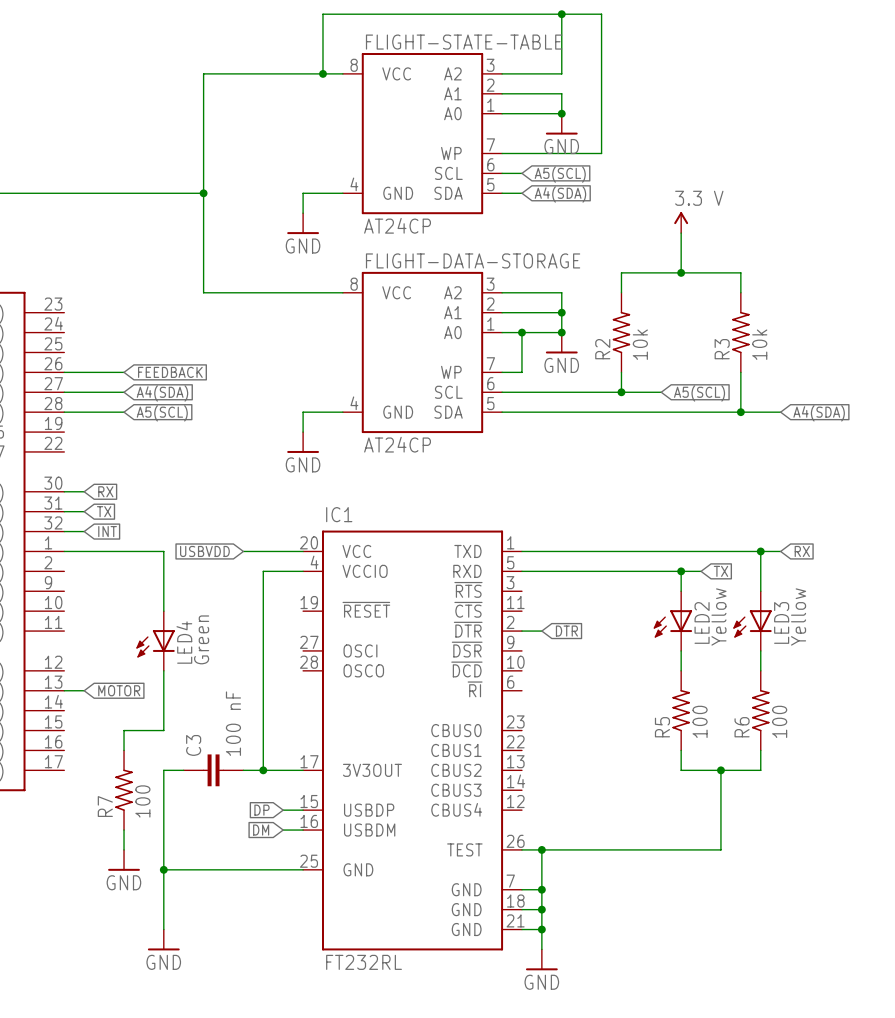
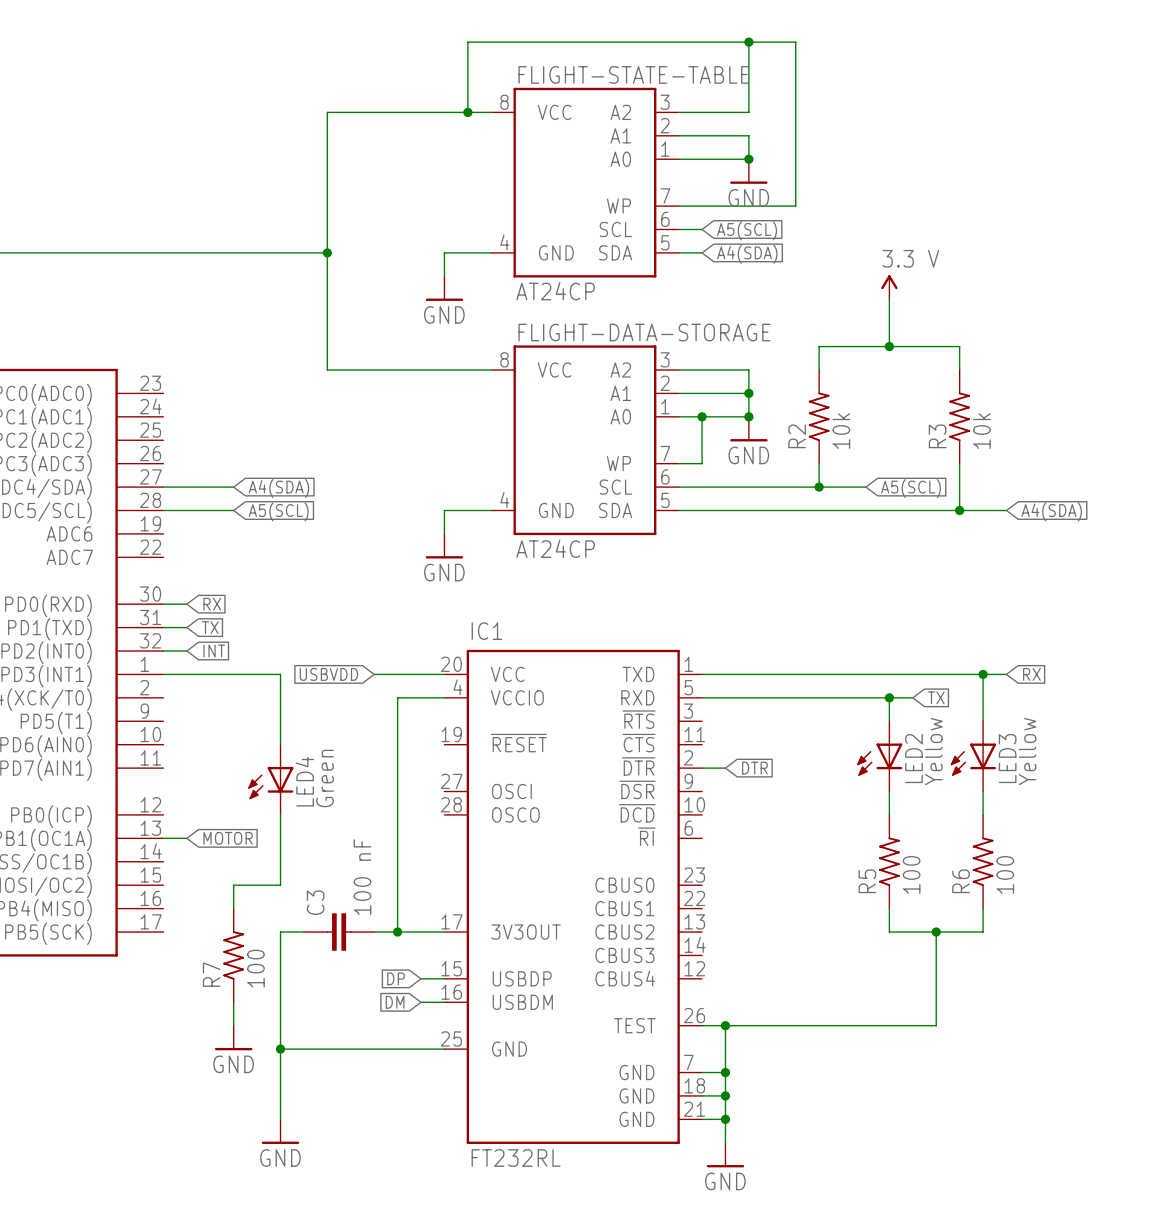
wire: (64, 372) (124, 372) -> none
global label: FEEDBACK (170, 372) -> none

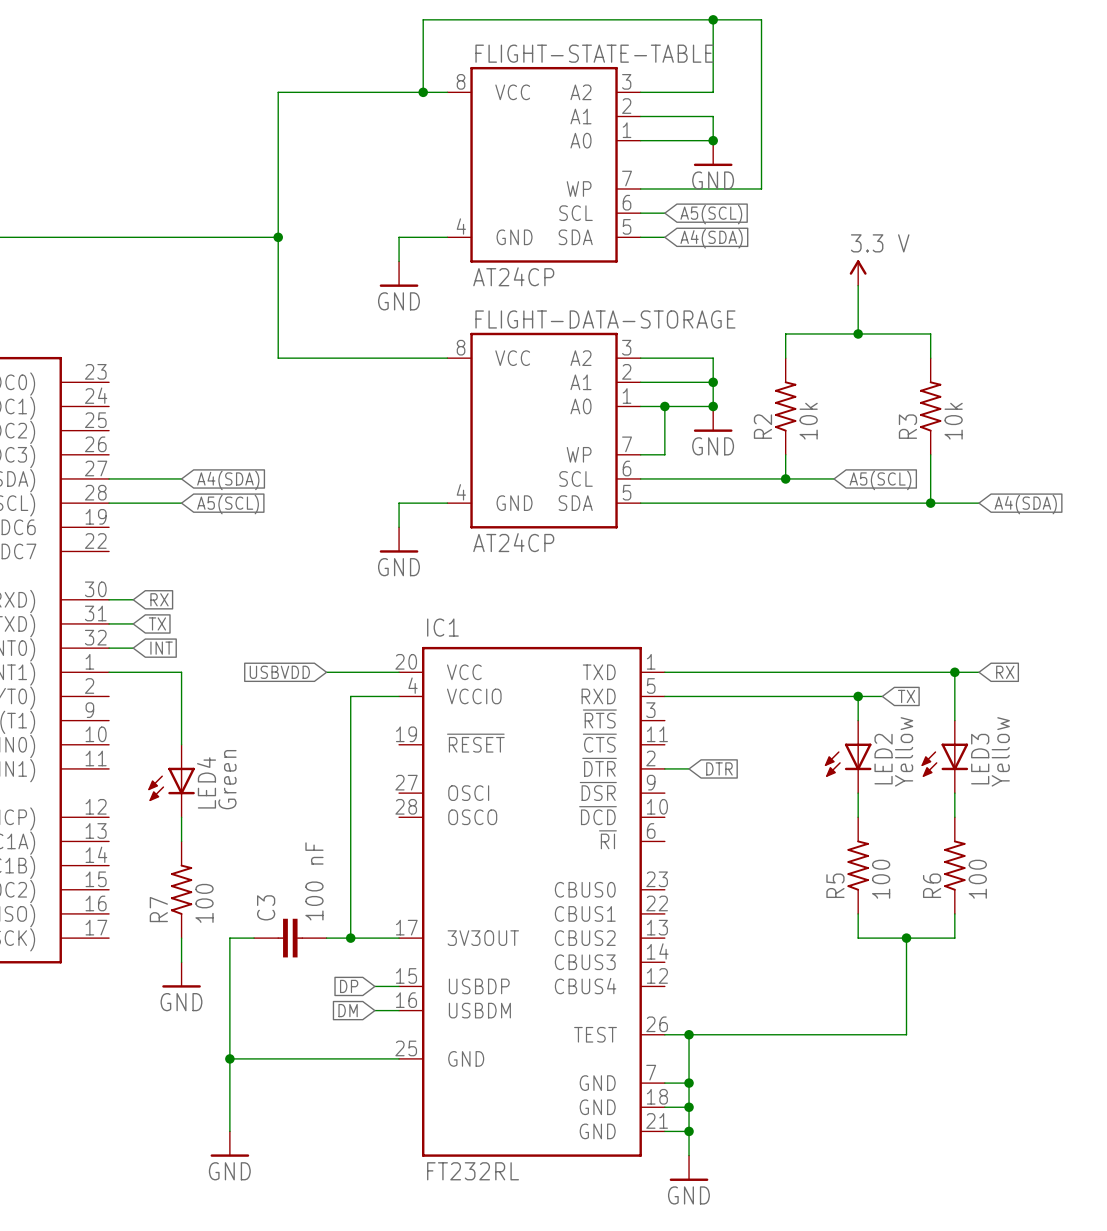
wire: (233, 674) (280, 674) (280, 744) -> (181, 672) (181, 744)
LED4 position: (270, 779) -> (171, 781)
wire: none -> (181, 817) (181, 841)
wire: (280, 814) (280, 885) (233, 885) (233, 908) -> none
wire: (163, 838) (186, 838) -> none
global label: MOTOR (228, 838) -> none
R7 position: (233, 955) -> (181, 889)
wire: (233, 1002) (233, 1025) -> (181, 938) (181, 962)
power symbol position: GND (233, 1037) -> GND (181, 974)

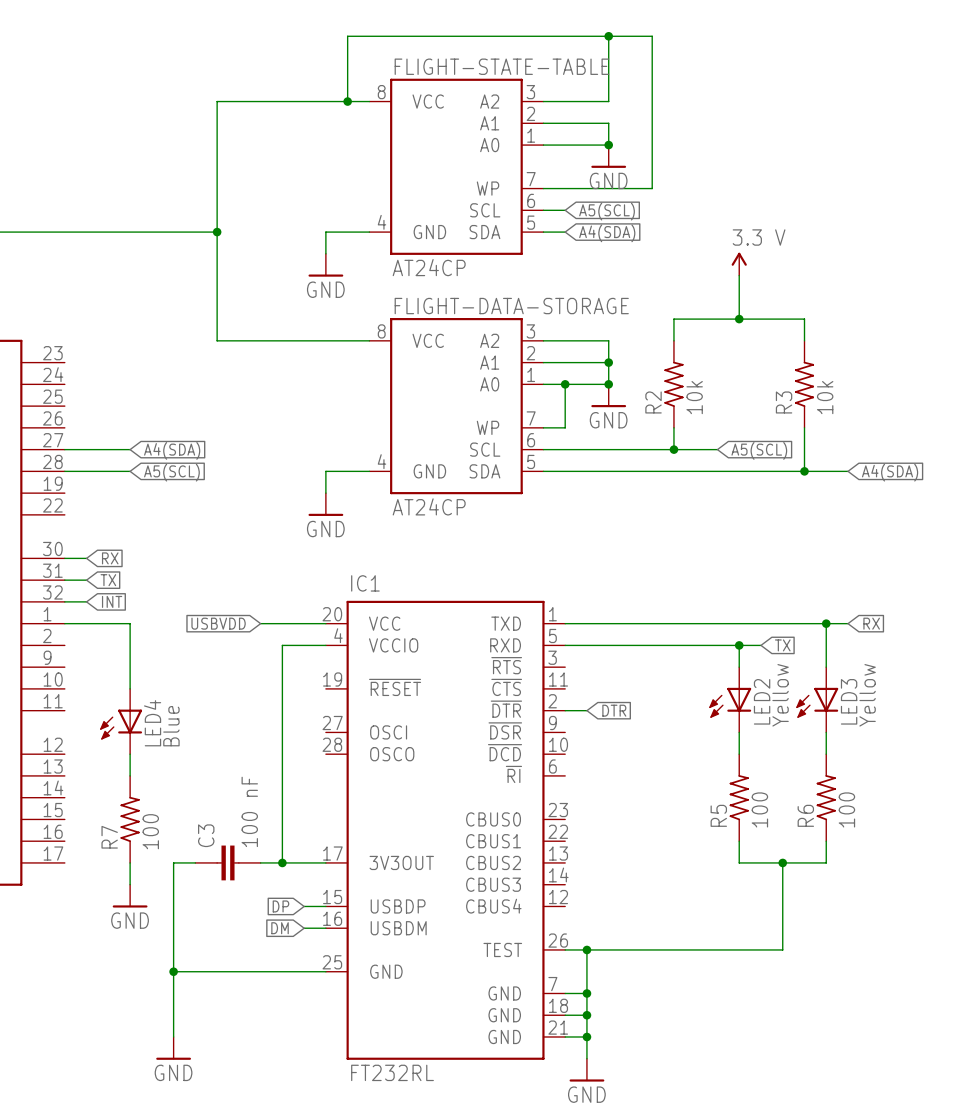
LED4 value: Green (227, 779) -> Blue (171, 726)

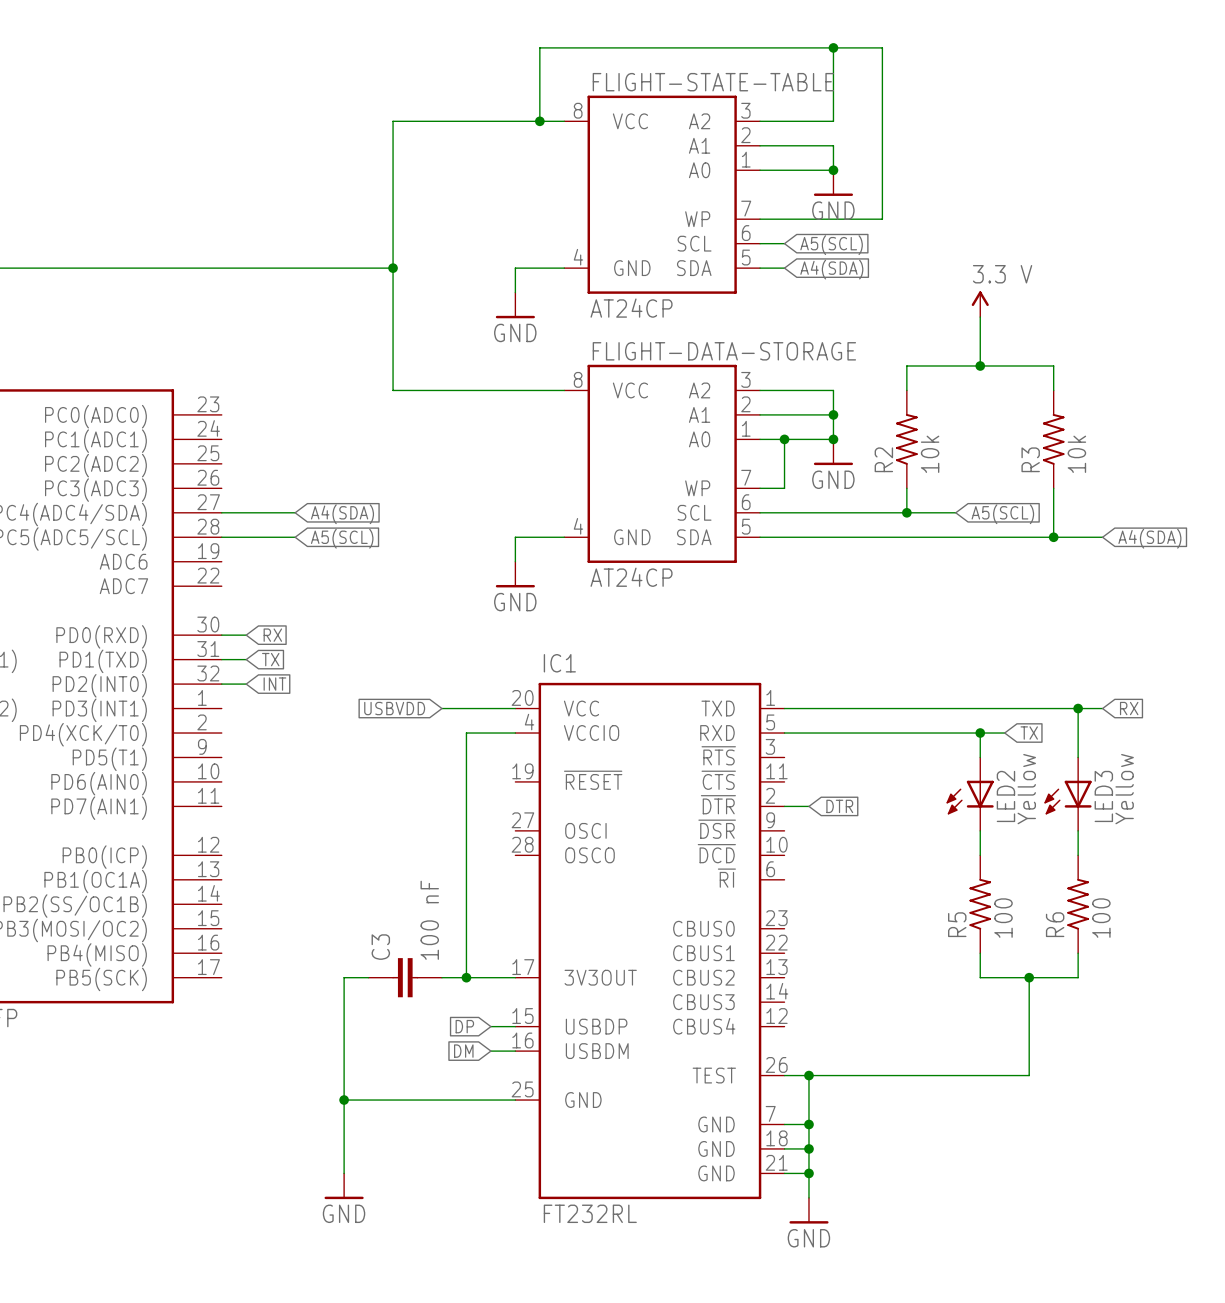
wire: (64, 623) (130, 623) (130, 688) -> none
LED4: Blue (121, 721) -> none
wire: (130, 754) (130, 775) -> none
R7: 100 (130, 819) -> none
wire: (130, 862) (130, 884) -> none
power symbol: GND (130, 896) -> none

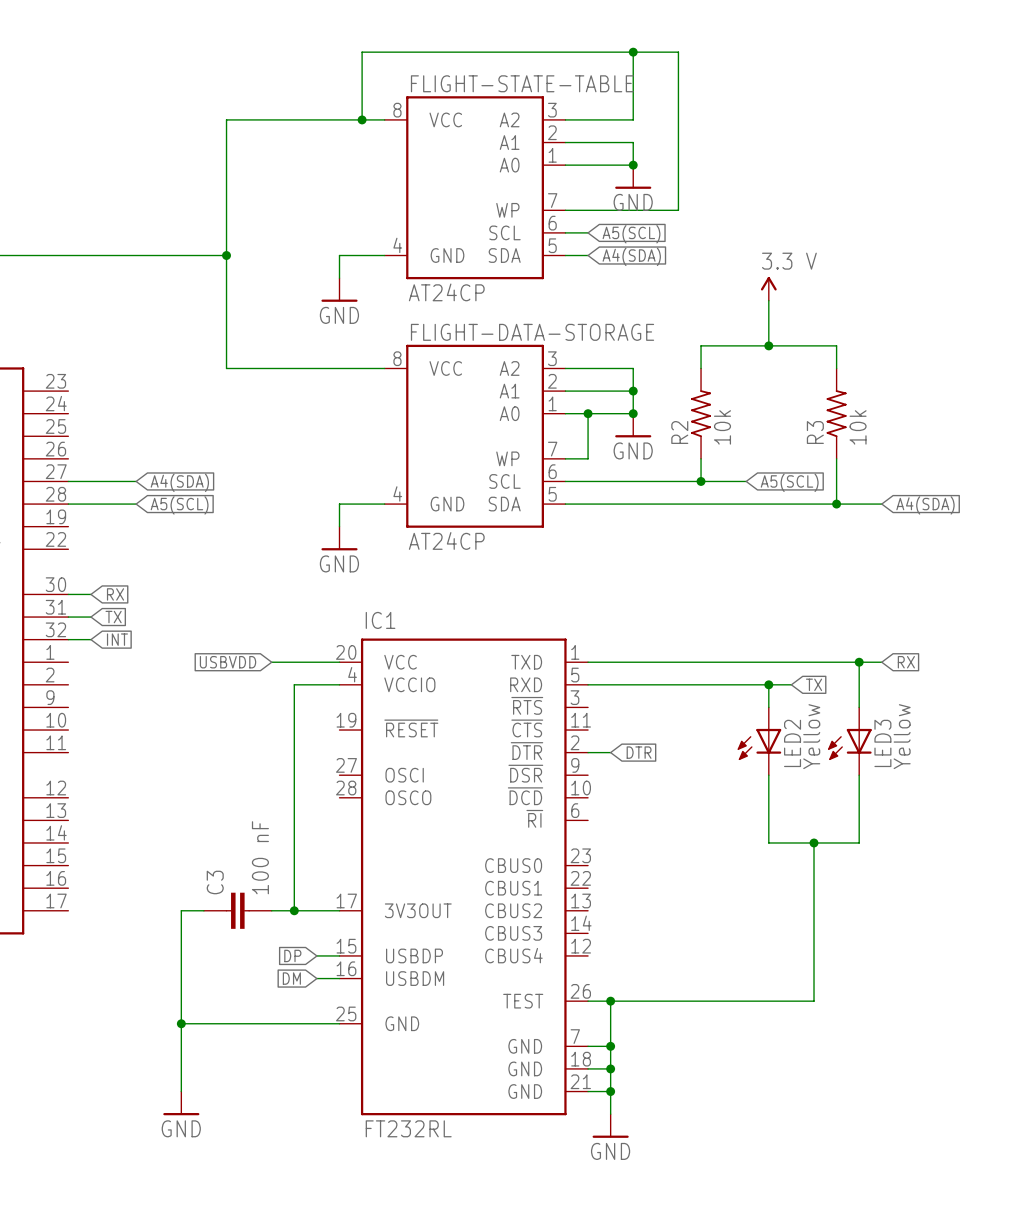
wire: none -> (768, 797) (768, 842) (859, 842) (859, 797)
R5: 100 (980, 904) -> none
wire: none -> (814, 842) (814, 910)
junction: none -> (814, 842)
R6: 100 (1078, 904) -> none
wire: (980, 953) (980, 977) (1078, 977) (1078, 953) -> none
junction: (1029, 977) -> none

